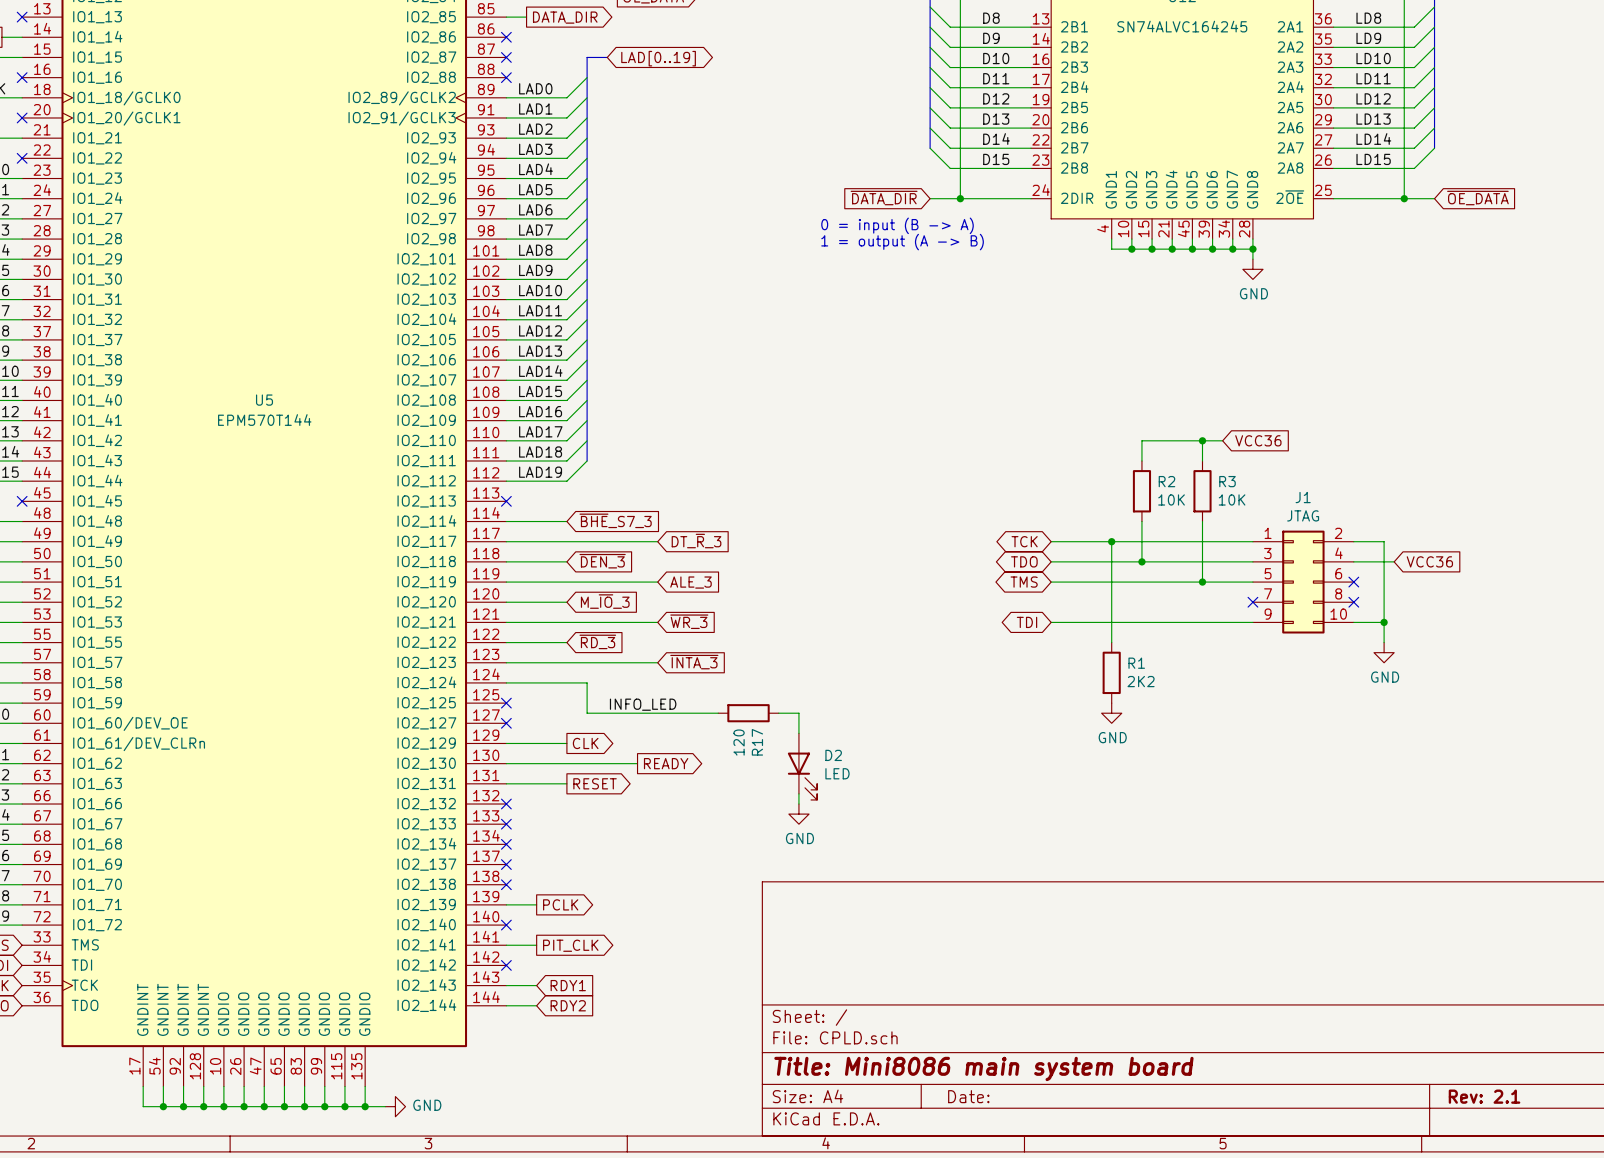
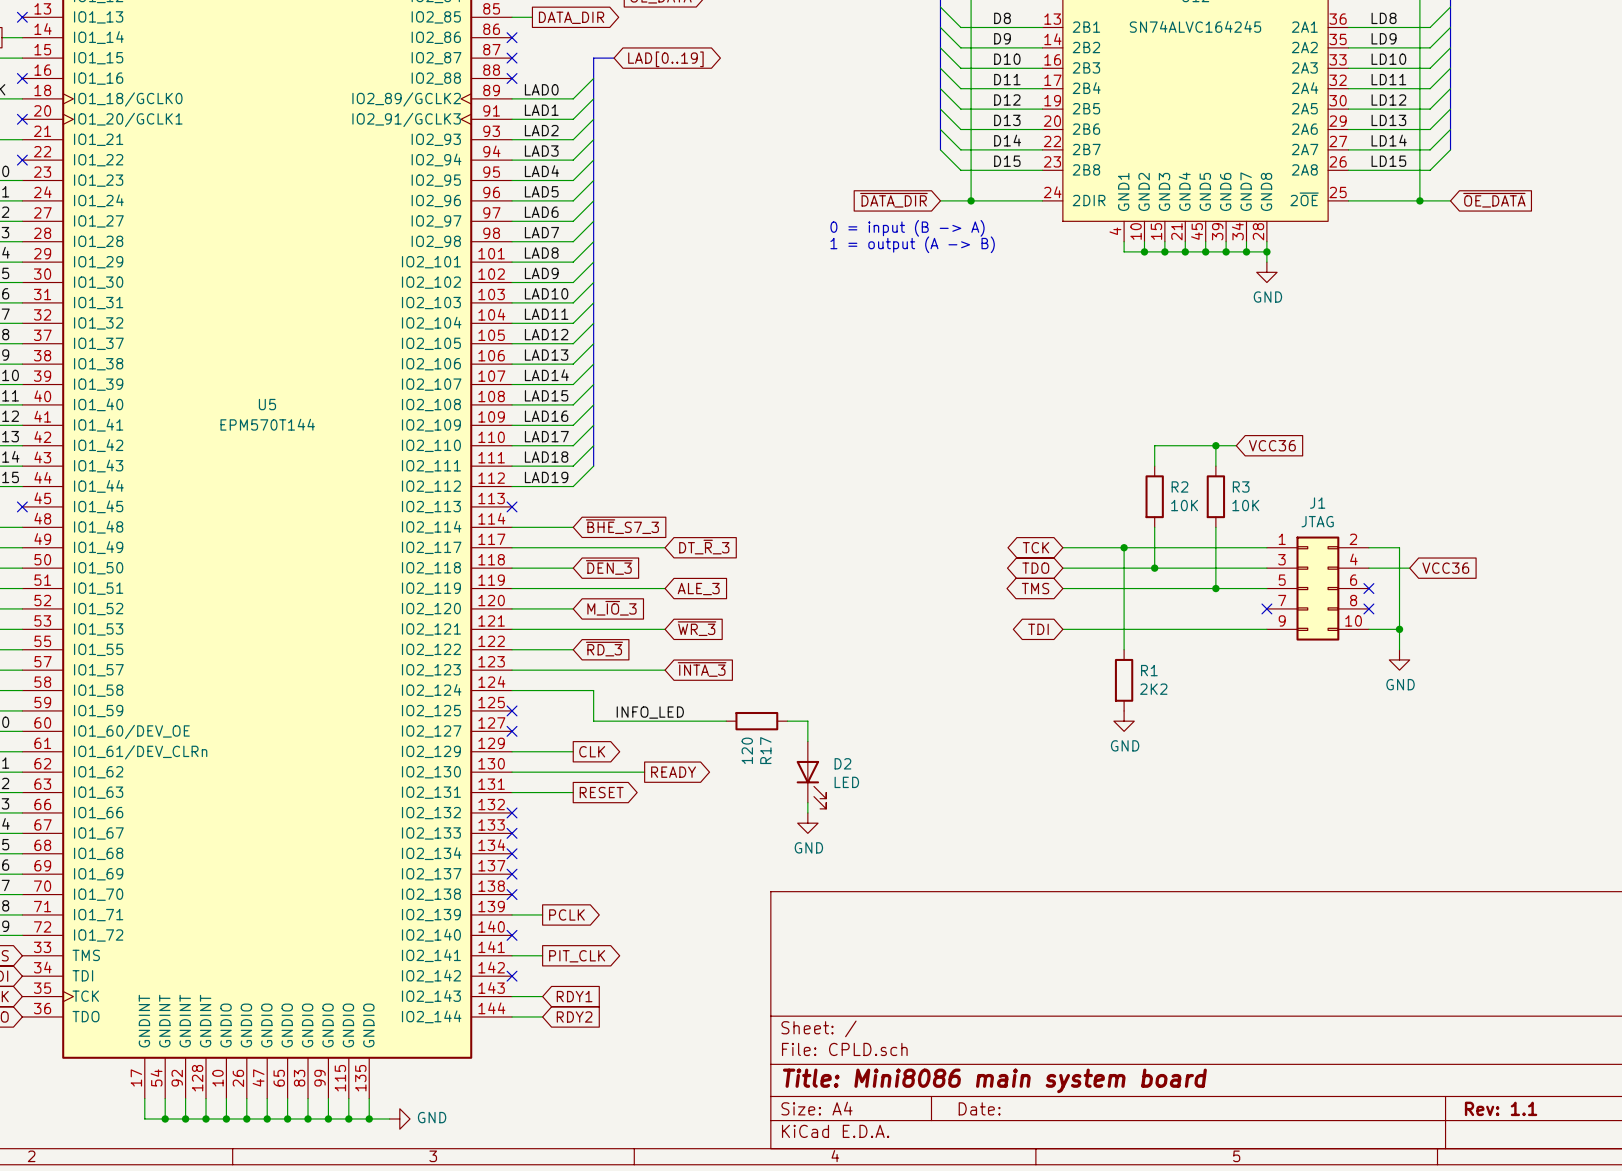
title block: Rev: 2.1 (1484, 1096) -> Rev: 1.1 (1501, 1108)

